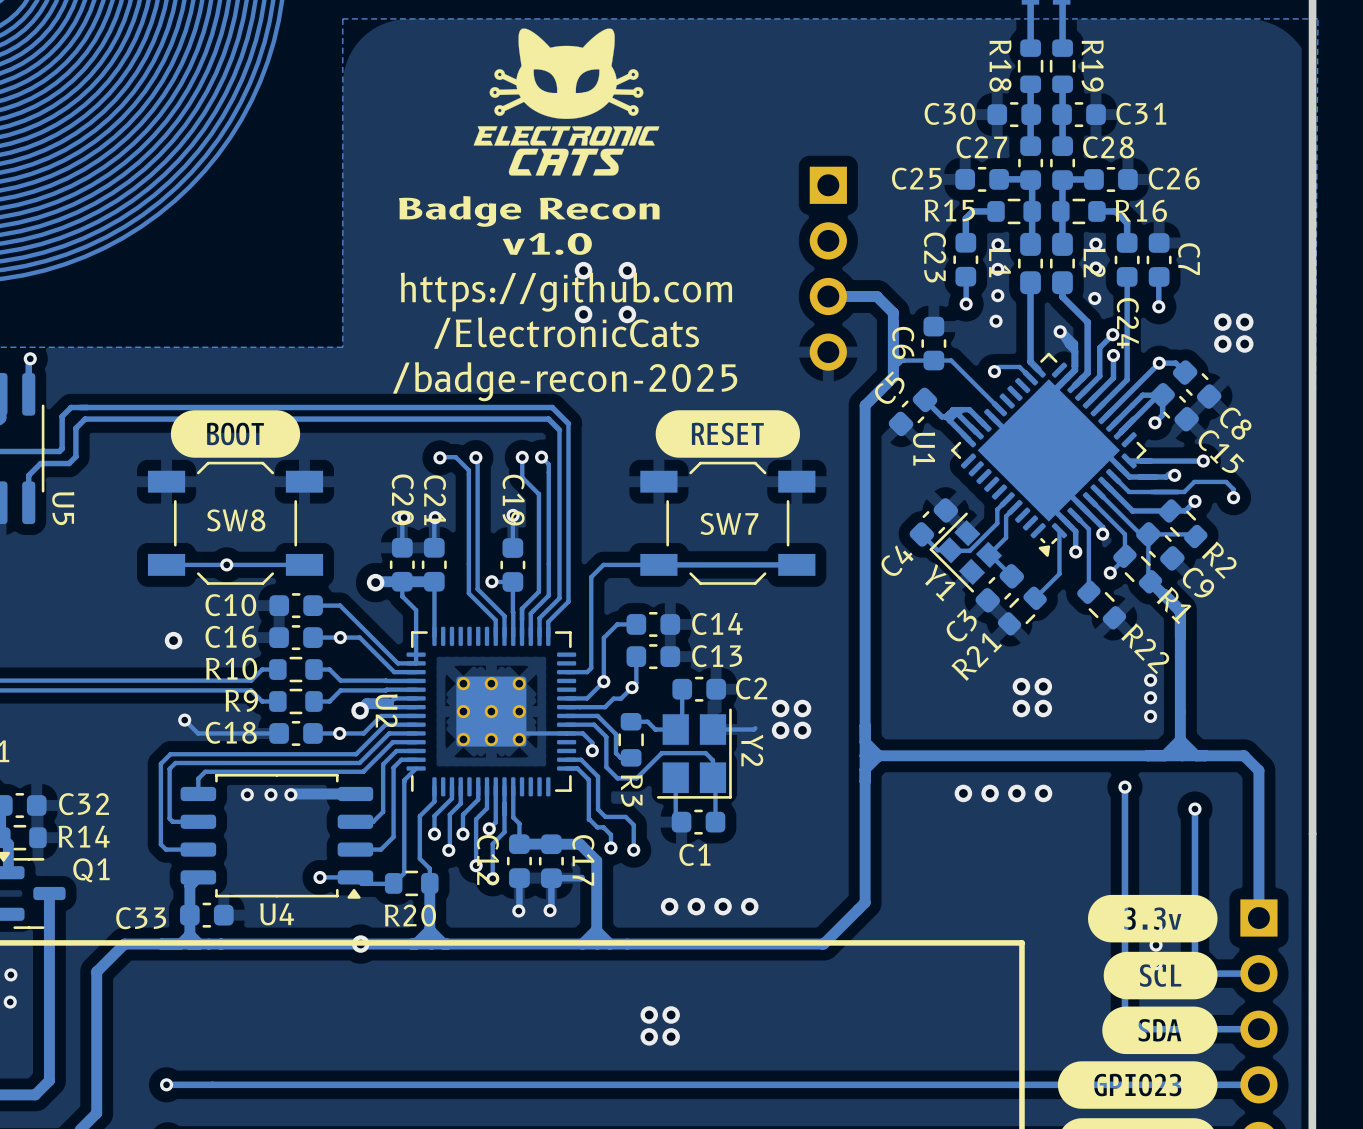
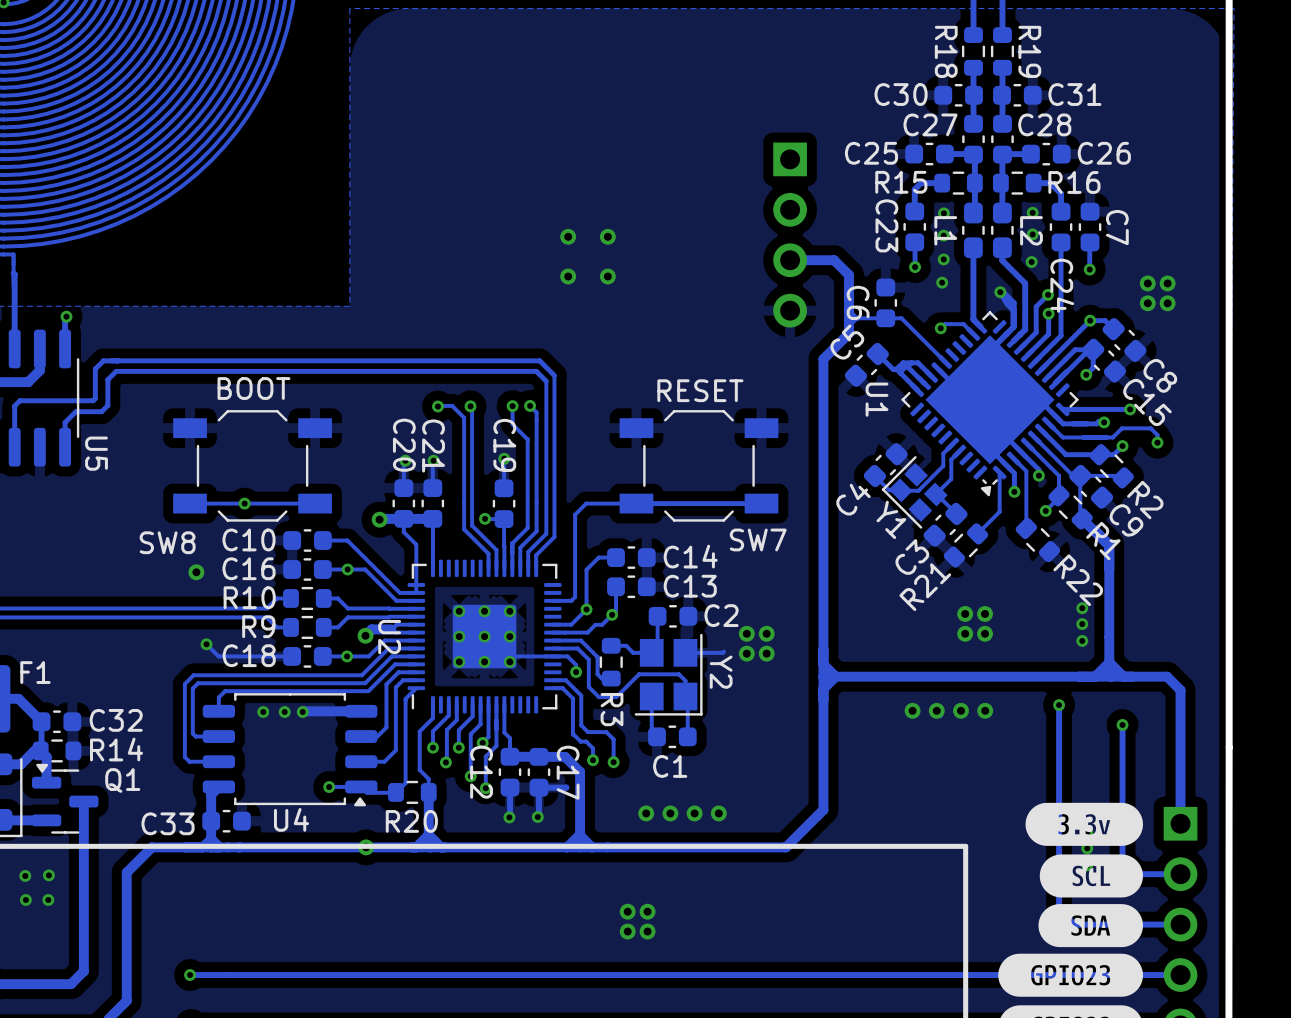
drawing: [473, 28, 660, 176] -> none
text: Badge Recon (529, 211) -> none
text: v1.0 (547, 243) -> none
text: https://github.com (566, 292) -> none
text: /ElectronicCats (566, 333) -> none
text: /badge-recon-2025 (565, 381) -> none
drawing: [170, 410, 301, 458] -> none
drawing: [655, 410, 801, 458] -> none
SW8 value: none -> BOOT (253, 388)
SW7 value: none -> RESET (700, 390)
SW8 name position: SW8 (236, 520) -> SW8 (167, 542)
SW7 name position: SW7 (729, 523) -> SW7 (758, 539)

